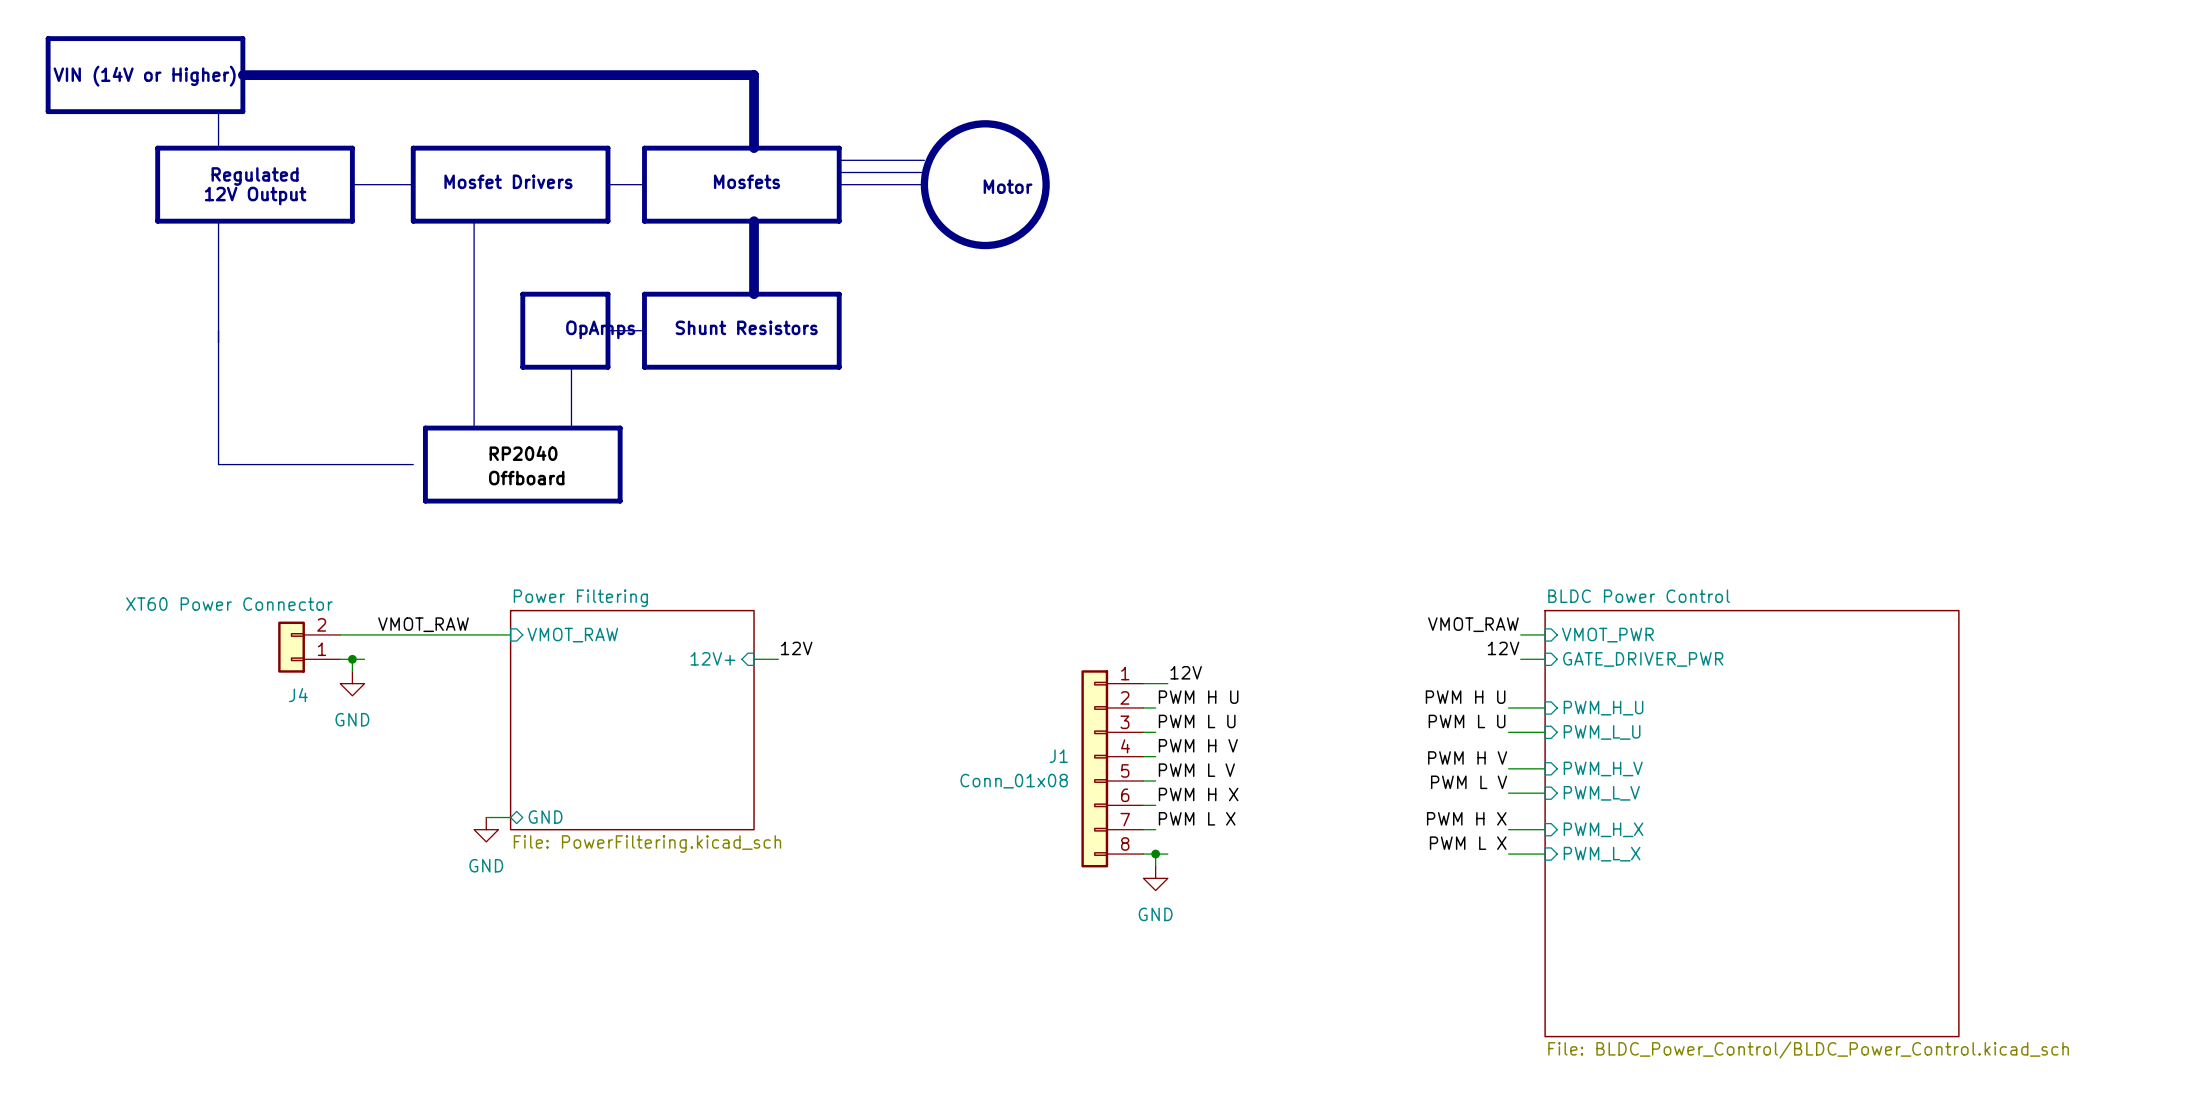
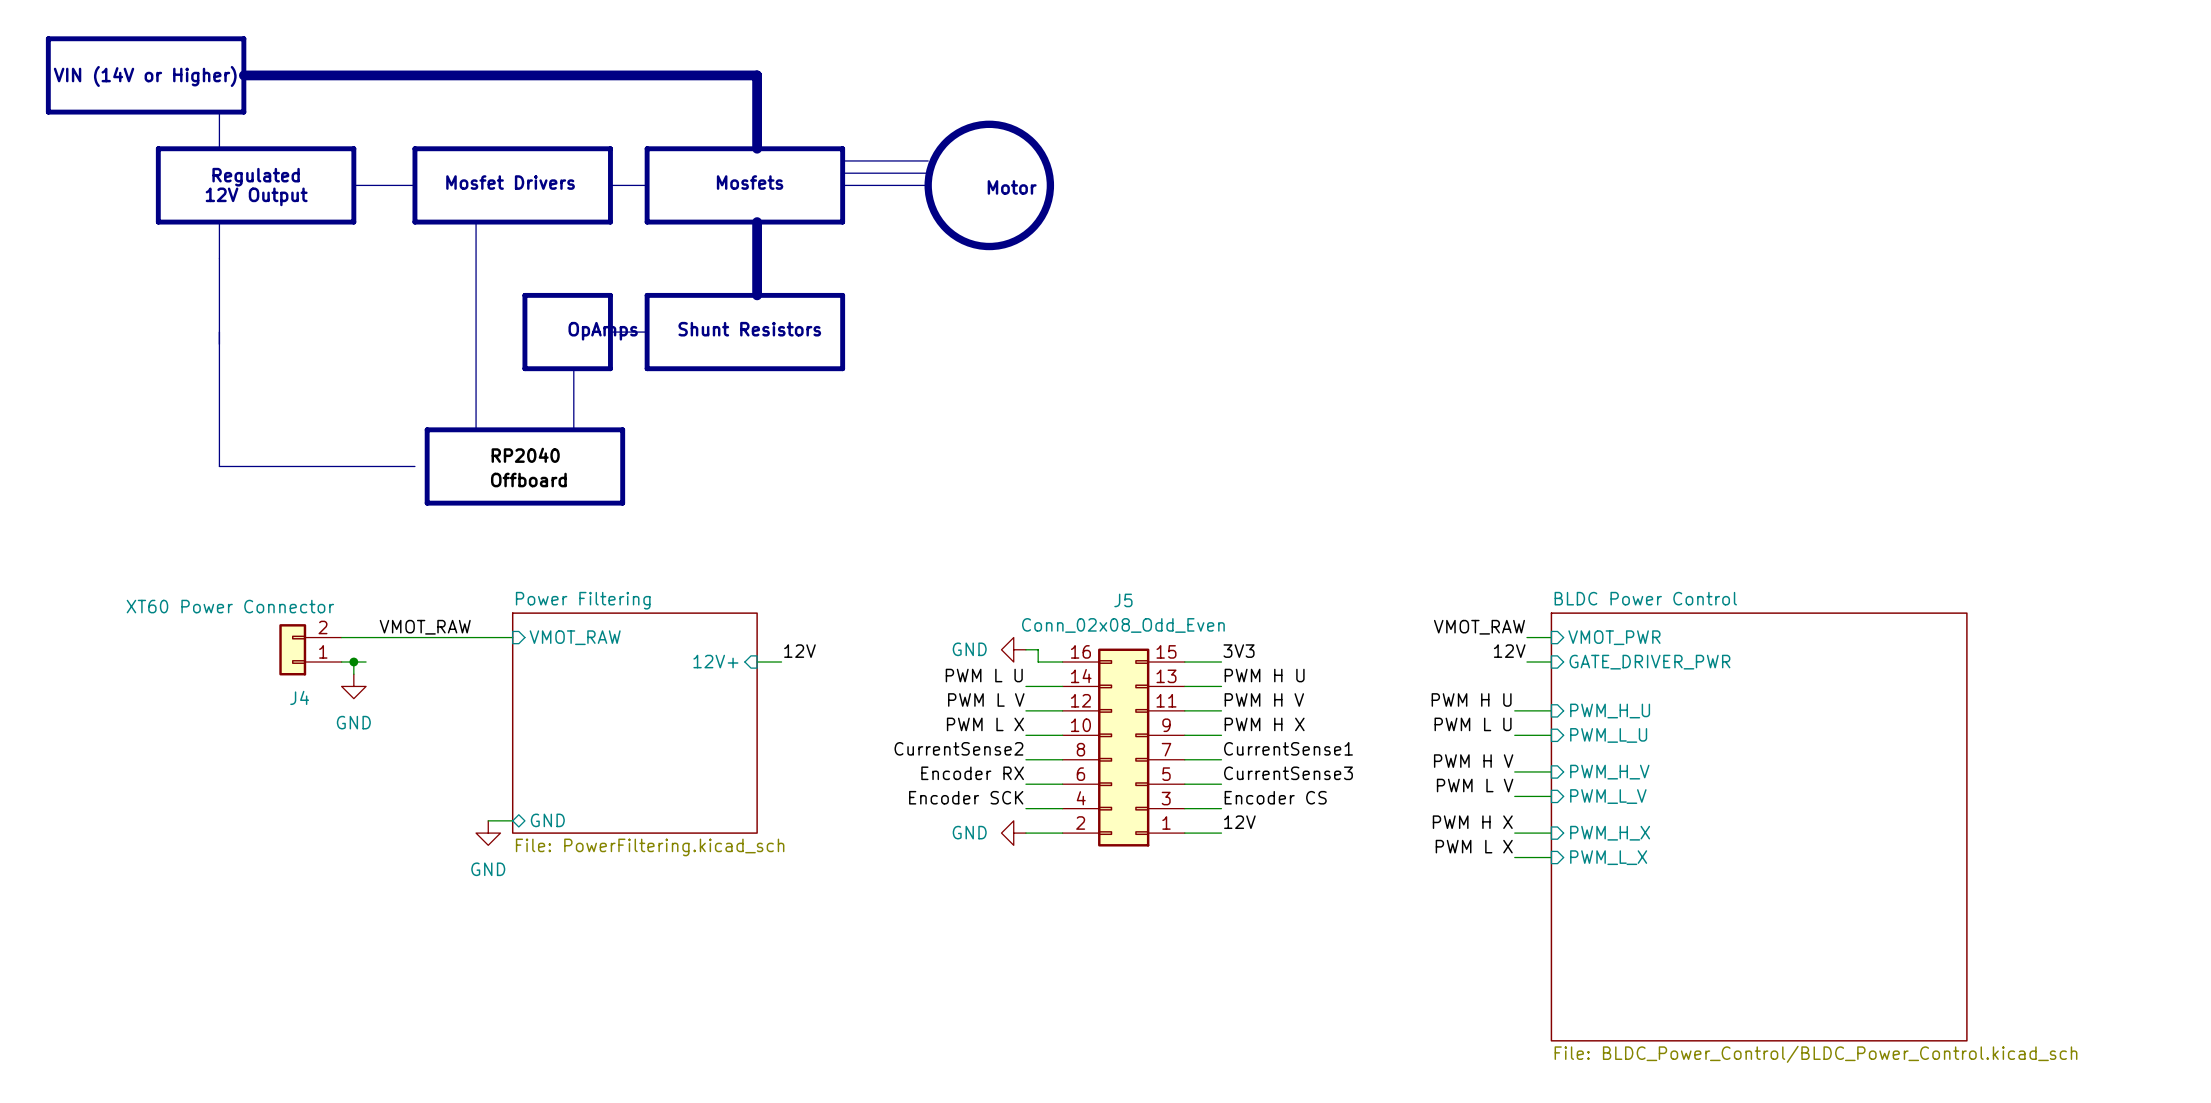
power symbol: none -> GND (1013, 649)
wire: none -> (1025, 649) (1038, 649) (1038, 662) (1062, 662)
label: none -> 3V3 (1239, 651)
wire: none -> (1184, 662) (1221, 662)
label position: 12V (1186, 672) -> 12V (1239, 822)
wire: none -> (1025, 686) (1062, 686)
wire: none -> (1184, 686) (1221, 686)
label position: PWM H U (1198, 697) -> PWM H U (1264, 675)
wire: none -> (1025, 710) (1062, 710)
wire: none -> (1184, 710) (1221, 710)
label position: PWM L U (1197, 721) -> PWM L U (984, 675)
wire: none -> (1025, 735) (1062, 735)
wire: none -> (1184, 735) (1221, 735)
J5: none -> Conn_02x08_Odd_Even (1123, 747)
label: none -> CurrentSense2 (958, 748)
label position: PWM H V (1198, 745) -> PWM H V (1264, 699)
label: none -> CurrentSense1 (1288, 748)
wire: none -> (1025, 759) (1062, 759)
wire: none -> (1184, 759) (1221, 759)
J1: Conn_01x08 (1112, 768) -> none
label: none -> Encoder RX (972, 773)
label position: PWM L V (1196, 770) -> PWM L V (986, 699)
label: none -> CurrentSense3 (1288, 773)
wire: none -> (1025, 784) (1062, 784)
wire: none -> (1184, 784) (1221, 784)
label: none -> Encoder SCK (966, 797)
label position: PWM H X (1198, 794) -> PWM H X (1264, 724)
label: none -> Encoder CS (1275, 797)
wire: none -> (1025, 808) (1062, 808)
wire: none -> (1184, 808) (1221, 808)
label position: PWM L X (1197, 818) -> PWM L X (985, 724)
power symbol: none -> GND (1013, 833)
wire: none -> (1025, 833) (1062, 833)
wire: none -> (1184, 833) (1221, 833)
wire: (1143, 854) (1167, 854) -> none
wire: (1155, 854) (1155, 866) -> none
junction: (1155, 854) -> none
power symbol: GND (1155, 878) -> none

